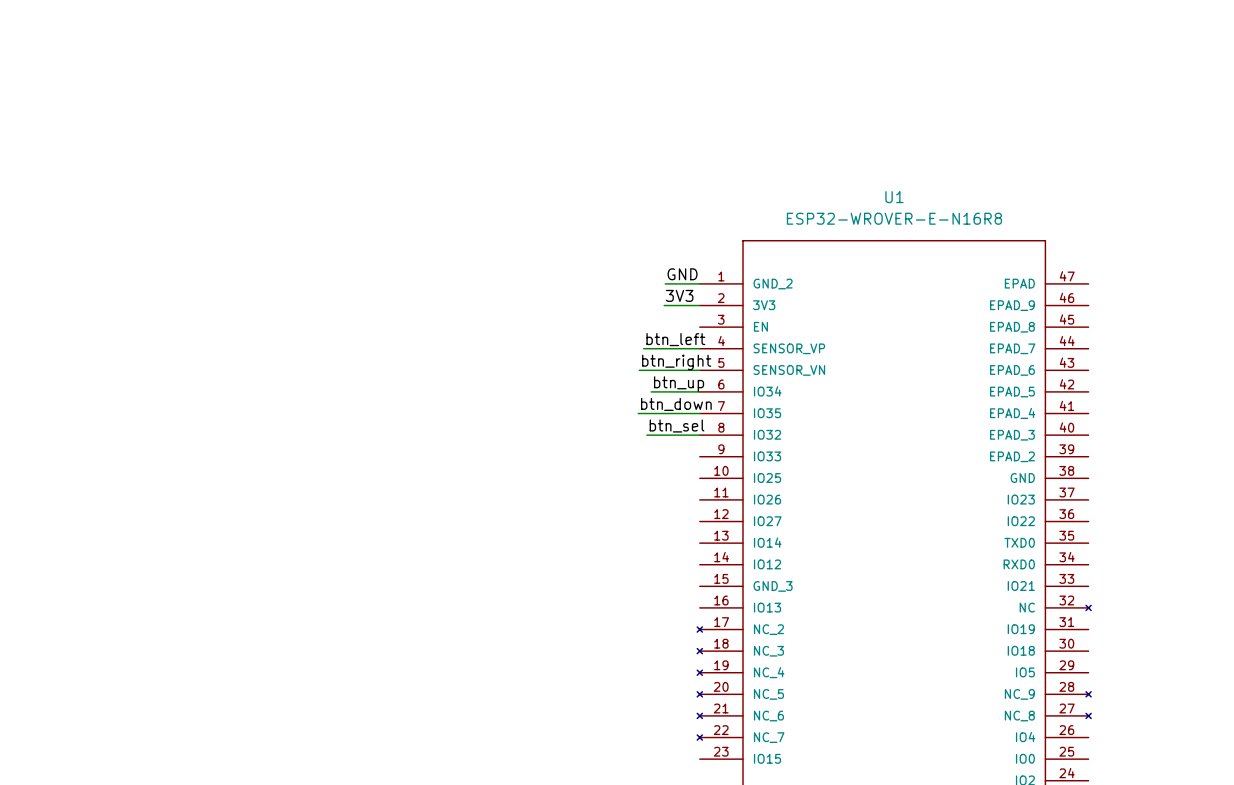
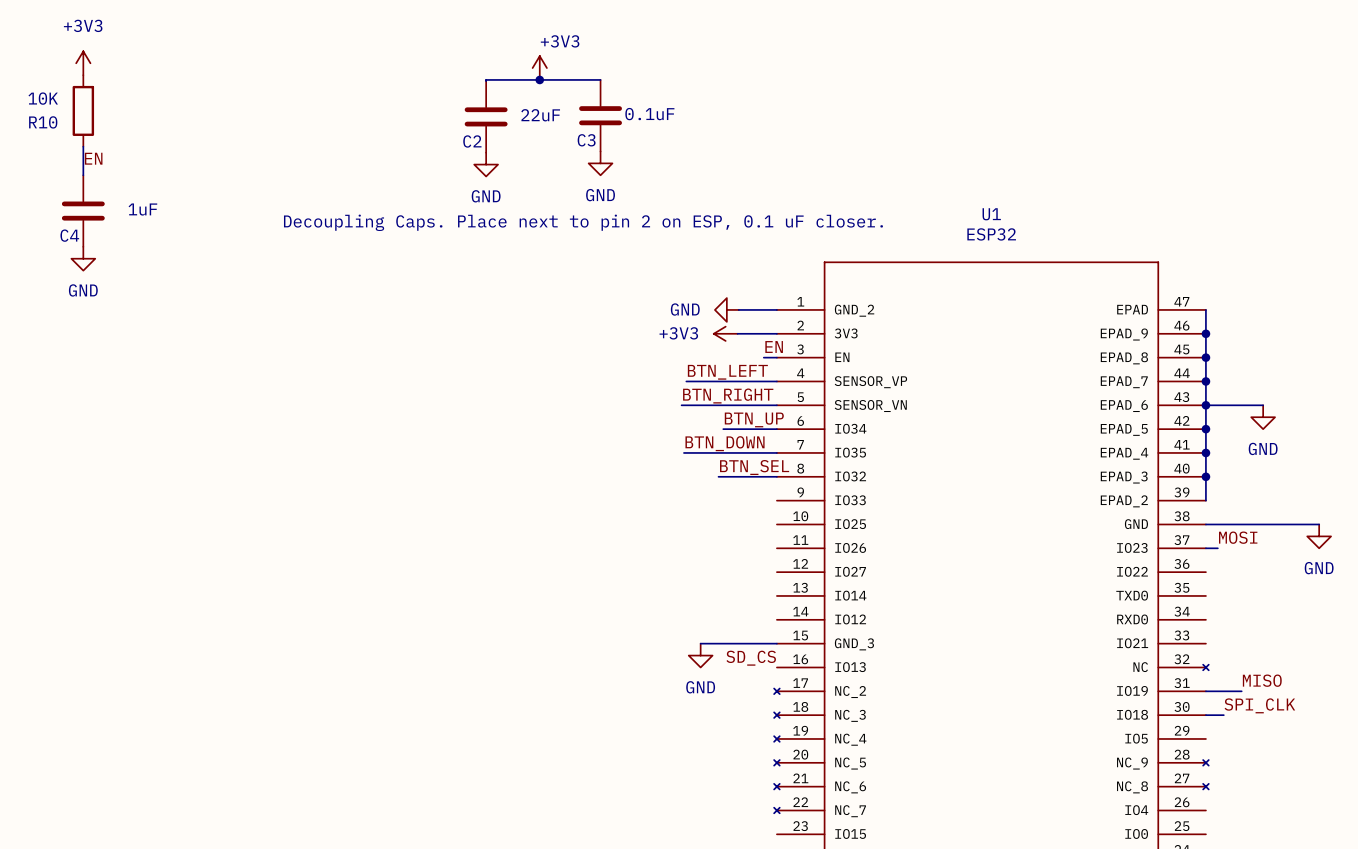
power symbol: none -> +3V3 (83, 63)
power symbol: none -> +3V3 (539, 68)
junction: none -> (539, 79)
wire: none -> (600, 79) (486, 81)
R10: none -> 10K (83, 110)
C3: none -> 0.1uF (600, 115)
C2: none -> 22uF (486, 116)
wire: none -> (83, 146) (83, 175)
label: none -> EN (93, 158)
power symbol: none -> GND (600, 163)
power symbol: none -> GND (486, 164)
C4: none -> 1uF (83, 211)
text: none -> Decoupling Caps. Place next to pin 2 on ESP, 0.1 uF closer. (583, 222)
U1 value: ESP32-WROVER-E-N16R8 (894, 218) -> ESP32 (991, 234)
power symbol: none -> GND (83, 258)
label: GND (682, 274) -> none
power symbol: none -> GND (726, 309)
wire: none -> (1205, 309) (1205, 500)
label: 3V3 (679, 295) -> none
power symbol: none -> +3V3 (725, 333)
junction: none -> (1205, 333)
label: none -> EN (774, 347)
wire: none -> (763, 357) (776, 357)
junction: none -> (1205, 357)
label: none -> BTN_LEFT (727, 372)
label: btn_left (675, 339) -> none
wire: none -> (686, 381) (714, 381)
junction: none -> (1205, 381)
label: none -> BTN_RIGHT (728, 396)
label: btn_right (676, 362) -> none
wire: none -> (681, 405) (710, 405)
wire: none -> (1205, 405) (1263, 405)
junction: none -> (1205, 405)
power symbol: none -> GND (1263, 417)
label: btn_up (679, 384) -> BTN_UP (754, 419)
junction: none -> (1205, 429)
label: none -> BTN_DOWN (725, 443)
label: btn_down (676, 404) -> none
wire: none -> (683, 452) (708, 452)
junction: none -> (1205, 452)
label: btn_sel (677, 426) -> BTN_SEL (754, 467)
junction: none -> (1205, 476)
wire: none -> (1205, 524) (1319, 524)
power symbol: none -> GND (1319, 536)
label: none -> MOSI (1238, 537)
wire: none -> (1205, 548) (1217, 548)
wire: none -> (700, 643) (776, 643)
power symbol: none -> GND (700, 655)
label: none -> SD_CS (751, 658)
label: none -> MISO (1262, 680)
wire: none -> (1205, 691) (1241, 691)
label: none -> SPI_CLK (1259, 705)
wire: none -> (1205, 715) (1223, 715)

